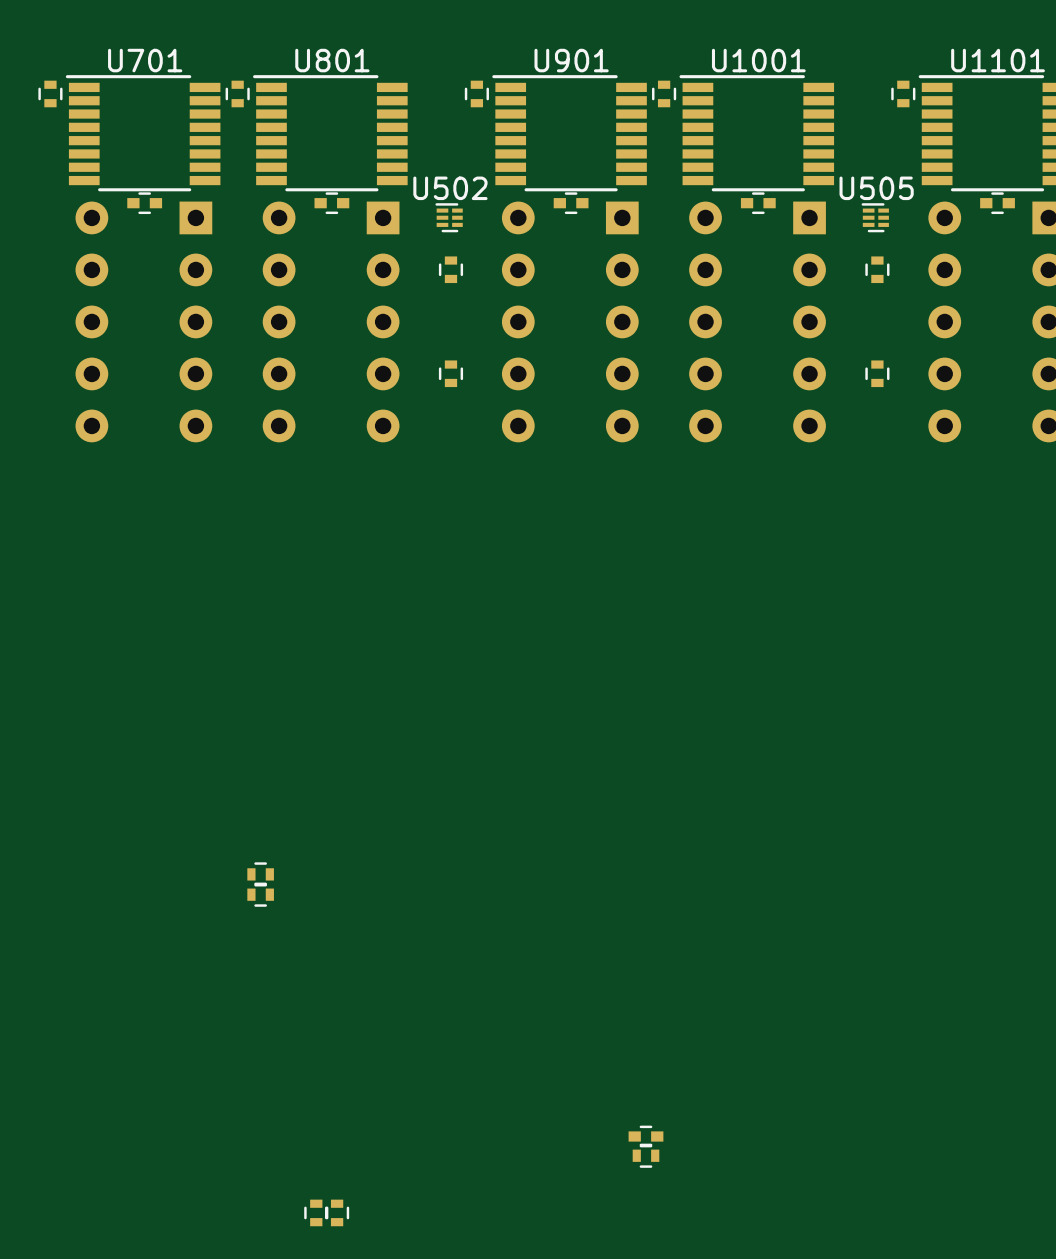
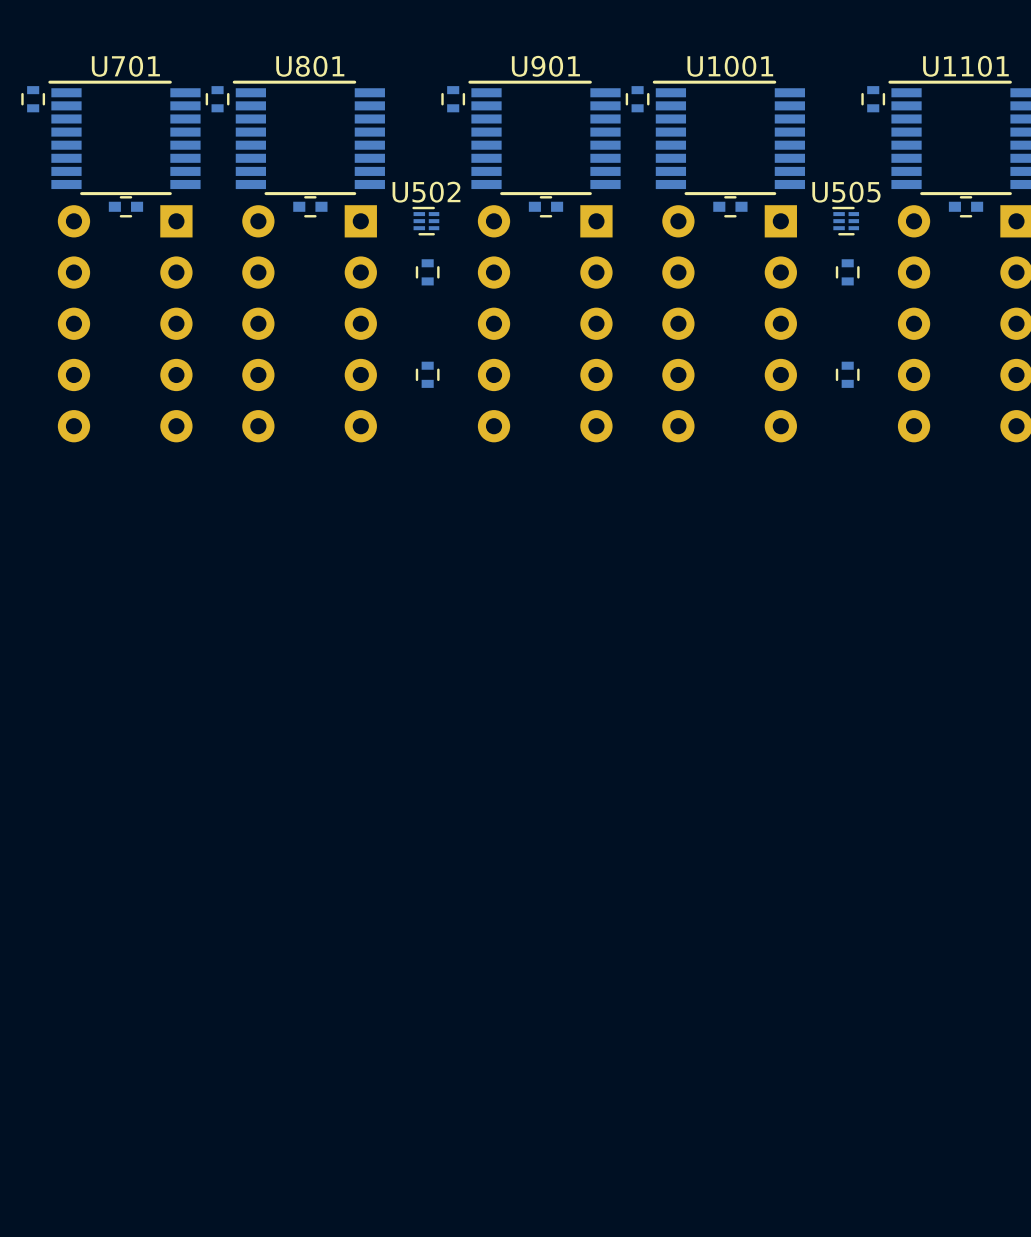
part: (260, 874) -> none
part: (260, 894) -> none
part: (645, 1136) -> none
part: (645, 1155) -> none
part: (316, 1212) -> none
part: (337, 1212) -> none

